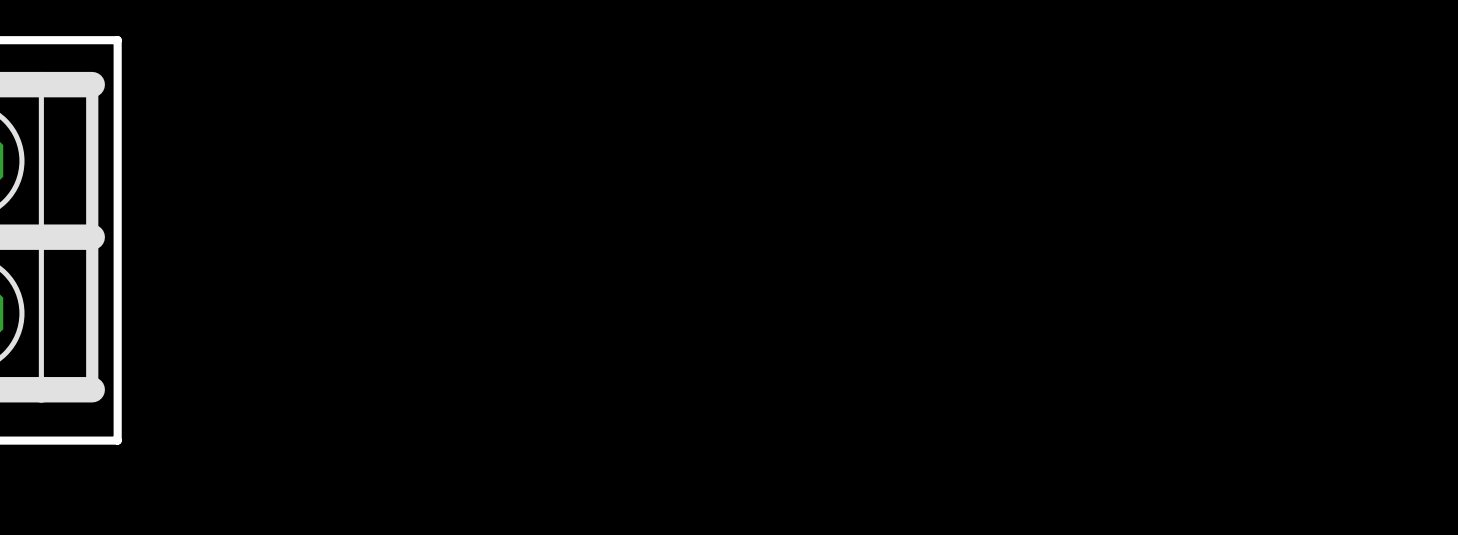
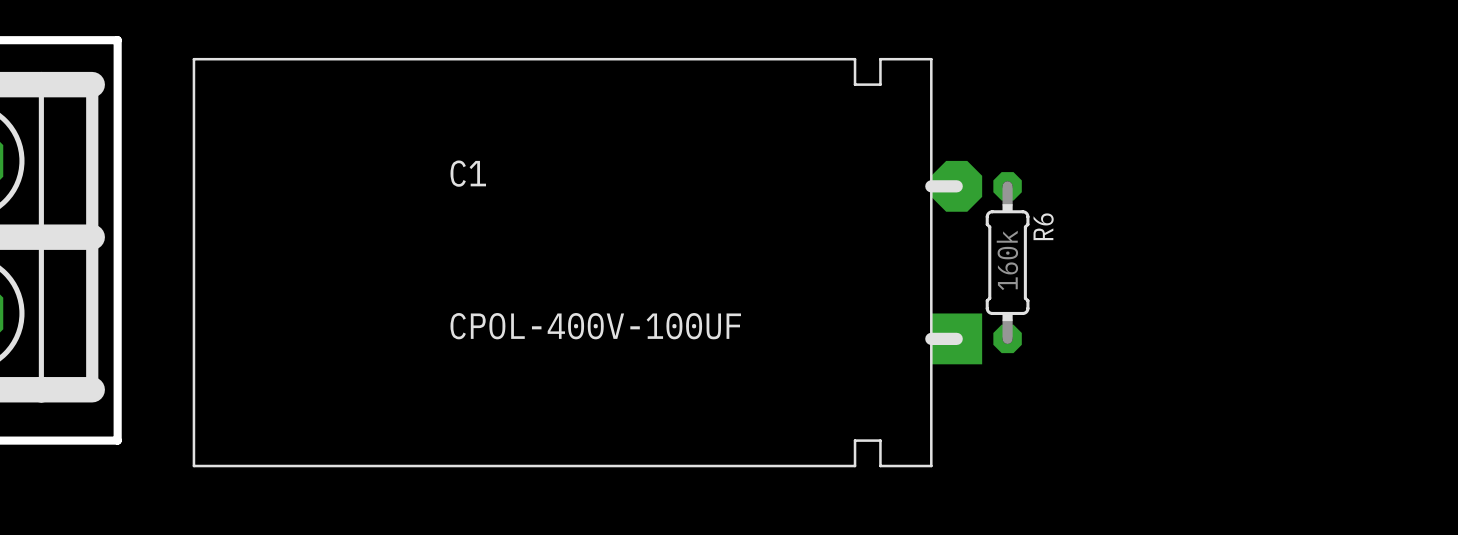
C1: none -> CPOL-400V-100UF (587, 262)
R6: none -> 160k (1007, 262)

